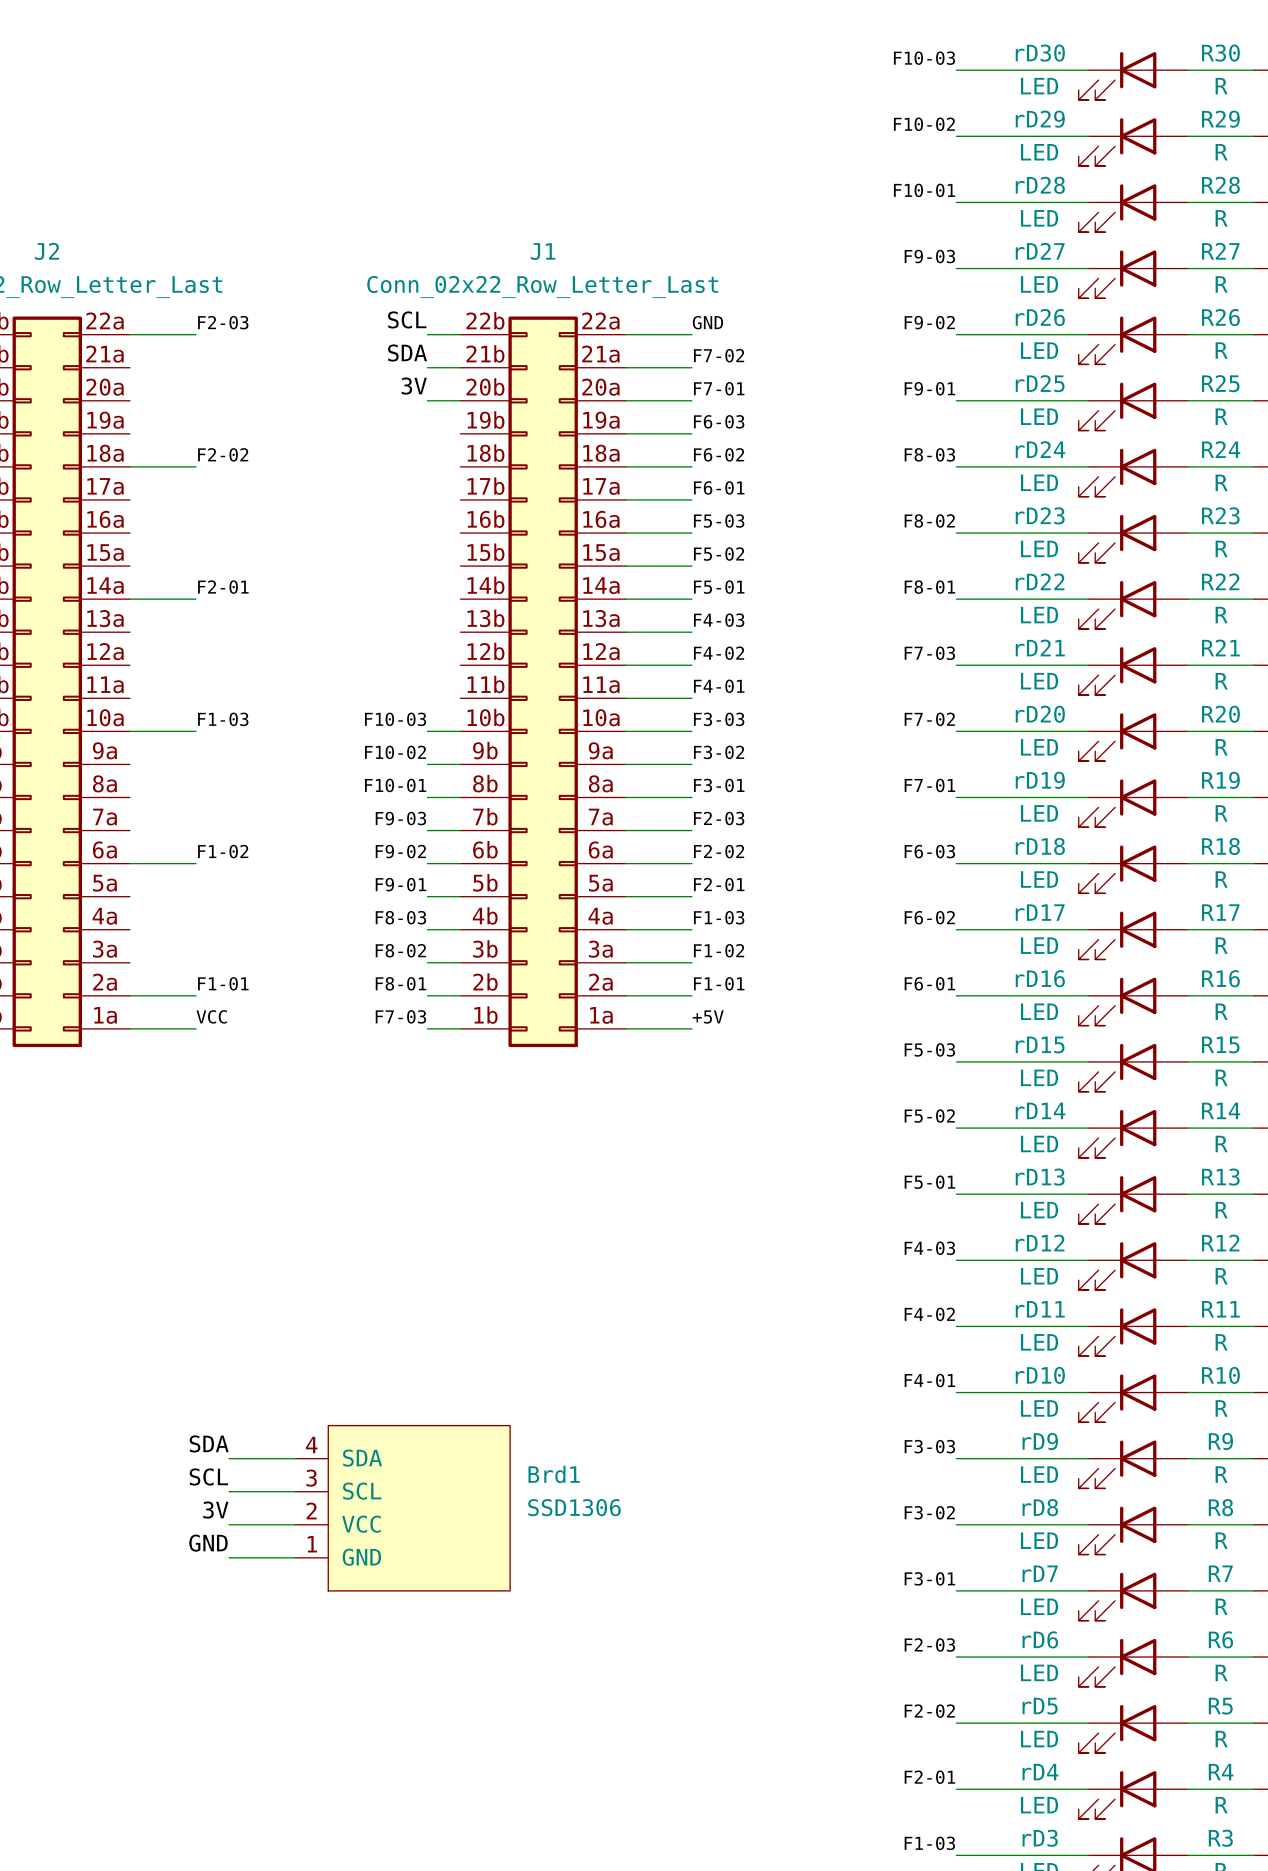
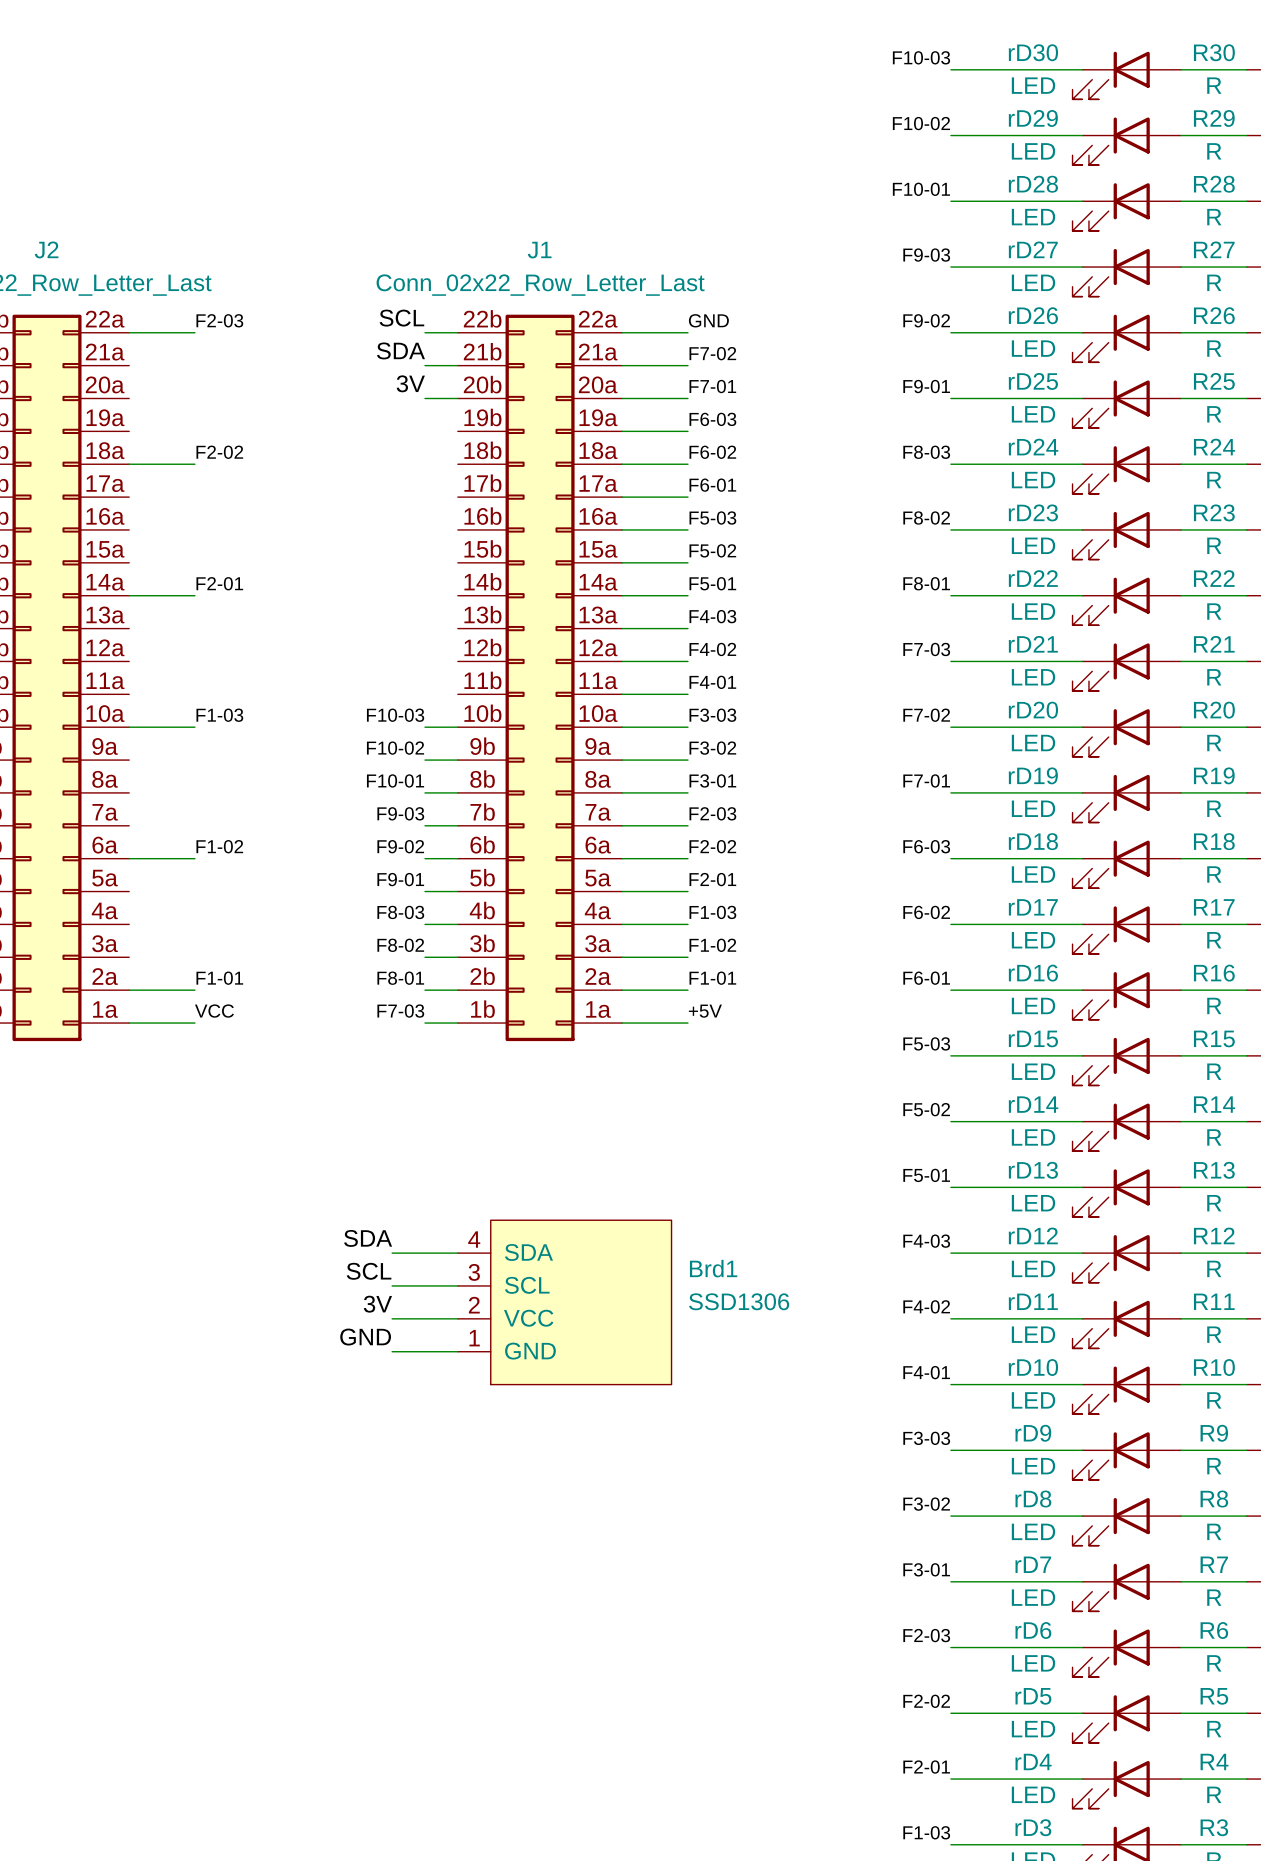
wire: none -> (392, 1253) (457, 1253)
label position: SDA (209, 1443) -> SDA (368, 1238)
wire: (229, 1458) (295, 1458) -> (392, 1351) (457, 1351)
label position: SCL (208, 1476) -> SCL (369, 1271)
wire: (229, 1491) (295, 1491) -> (392, 1318) (457, 1318)
Brd1 position: (402, 1508) -> (564, 1302)
label position: 3V (215, 1510) -> 3V (377, 1304)
wire: (229, 1524) (295, 1524) -> (392, 1285) (457, 1285)
label position: GND (208, 1543) -> GND (365, 1337)
wire: (229, 1557) (295, 1557) -> none

